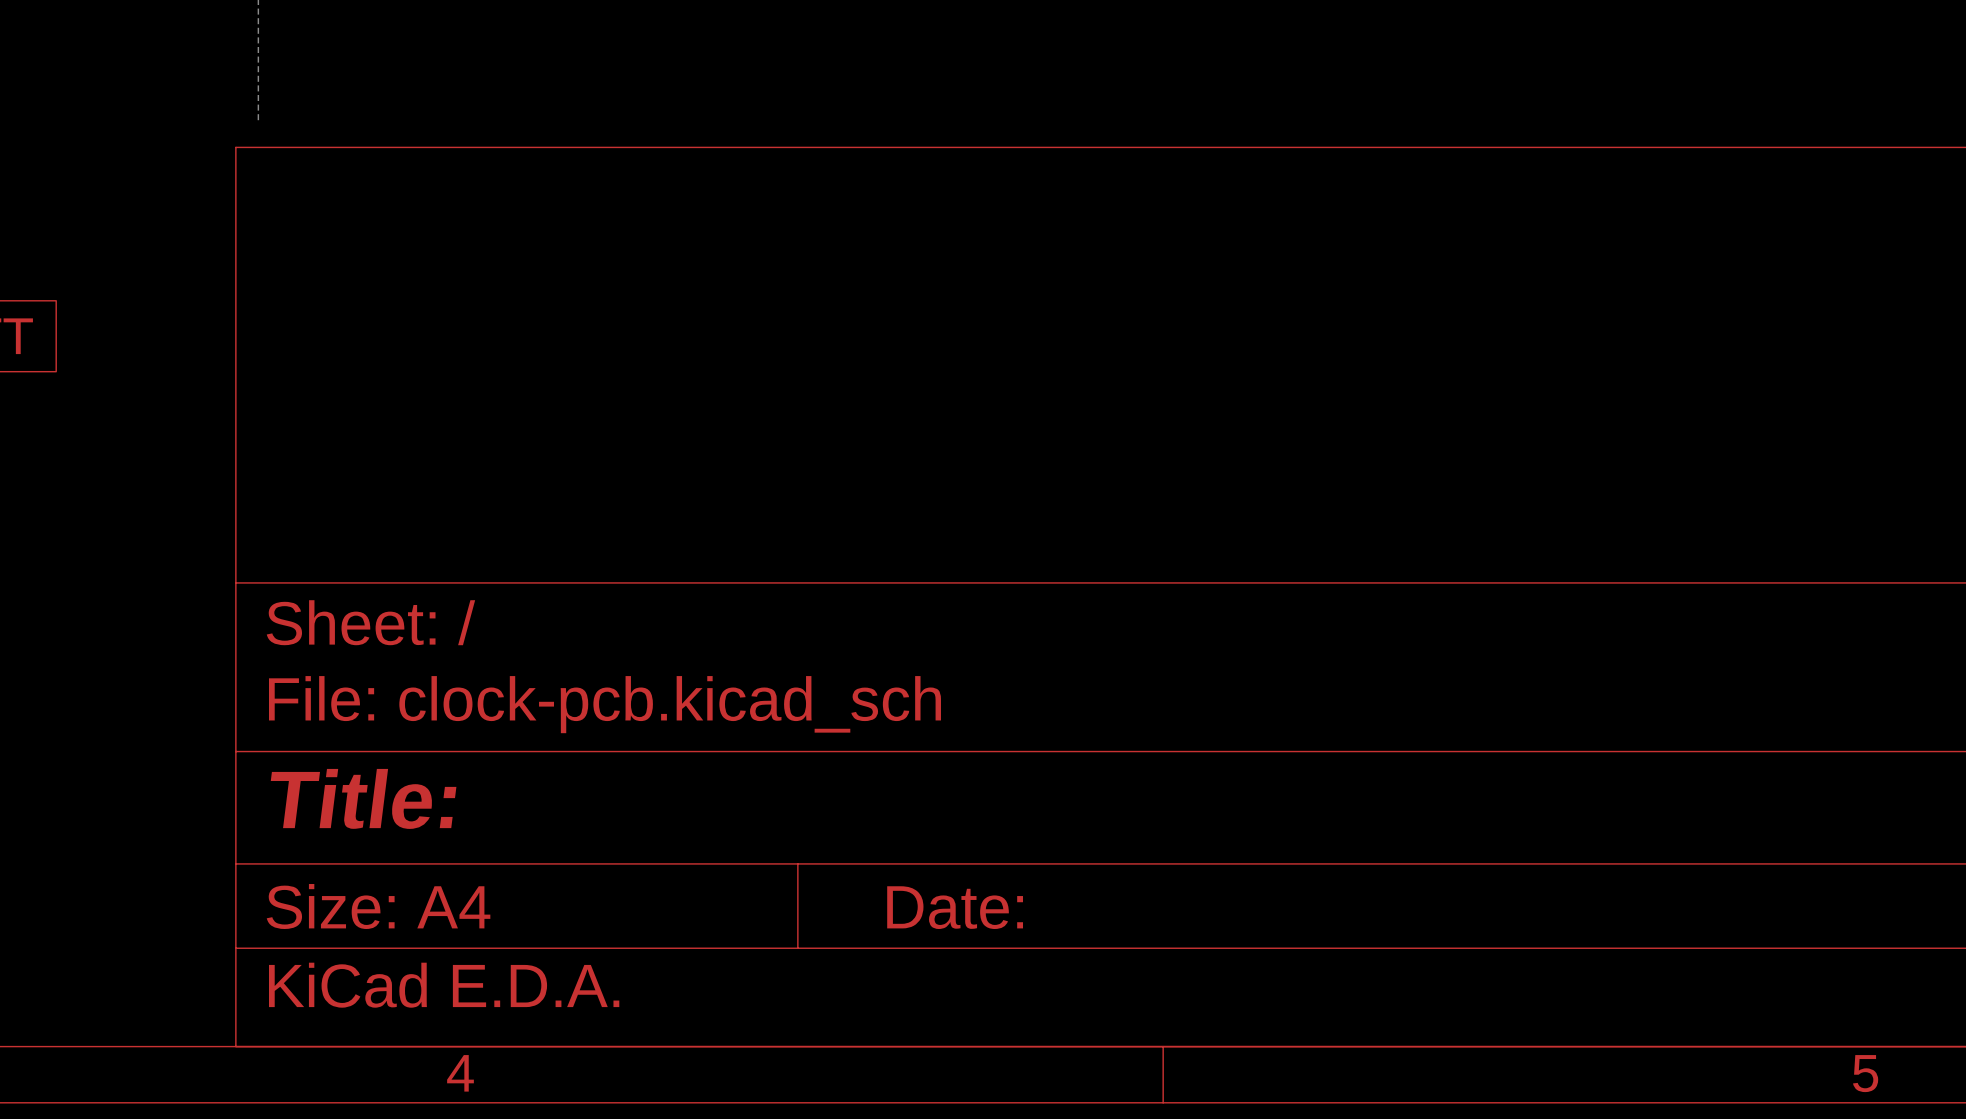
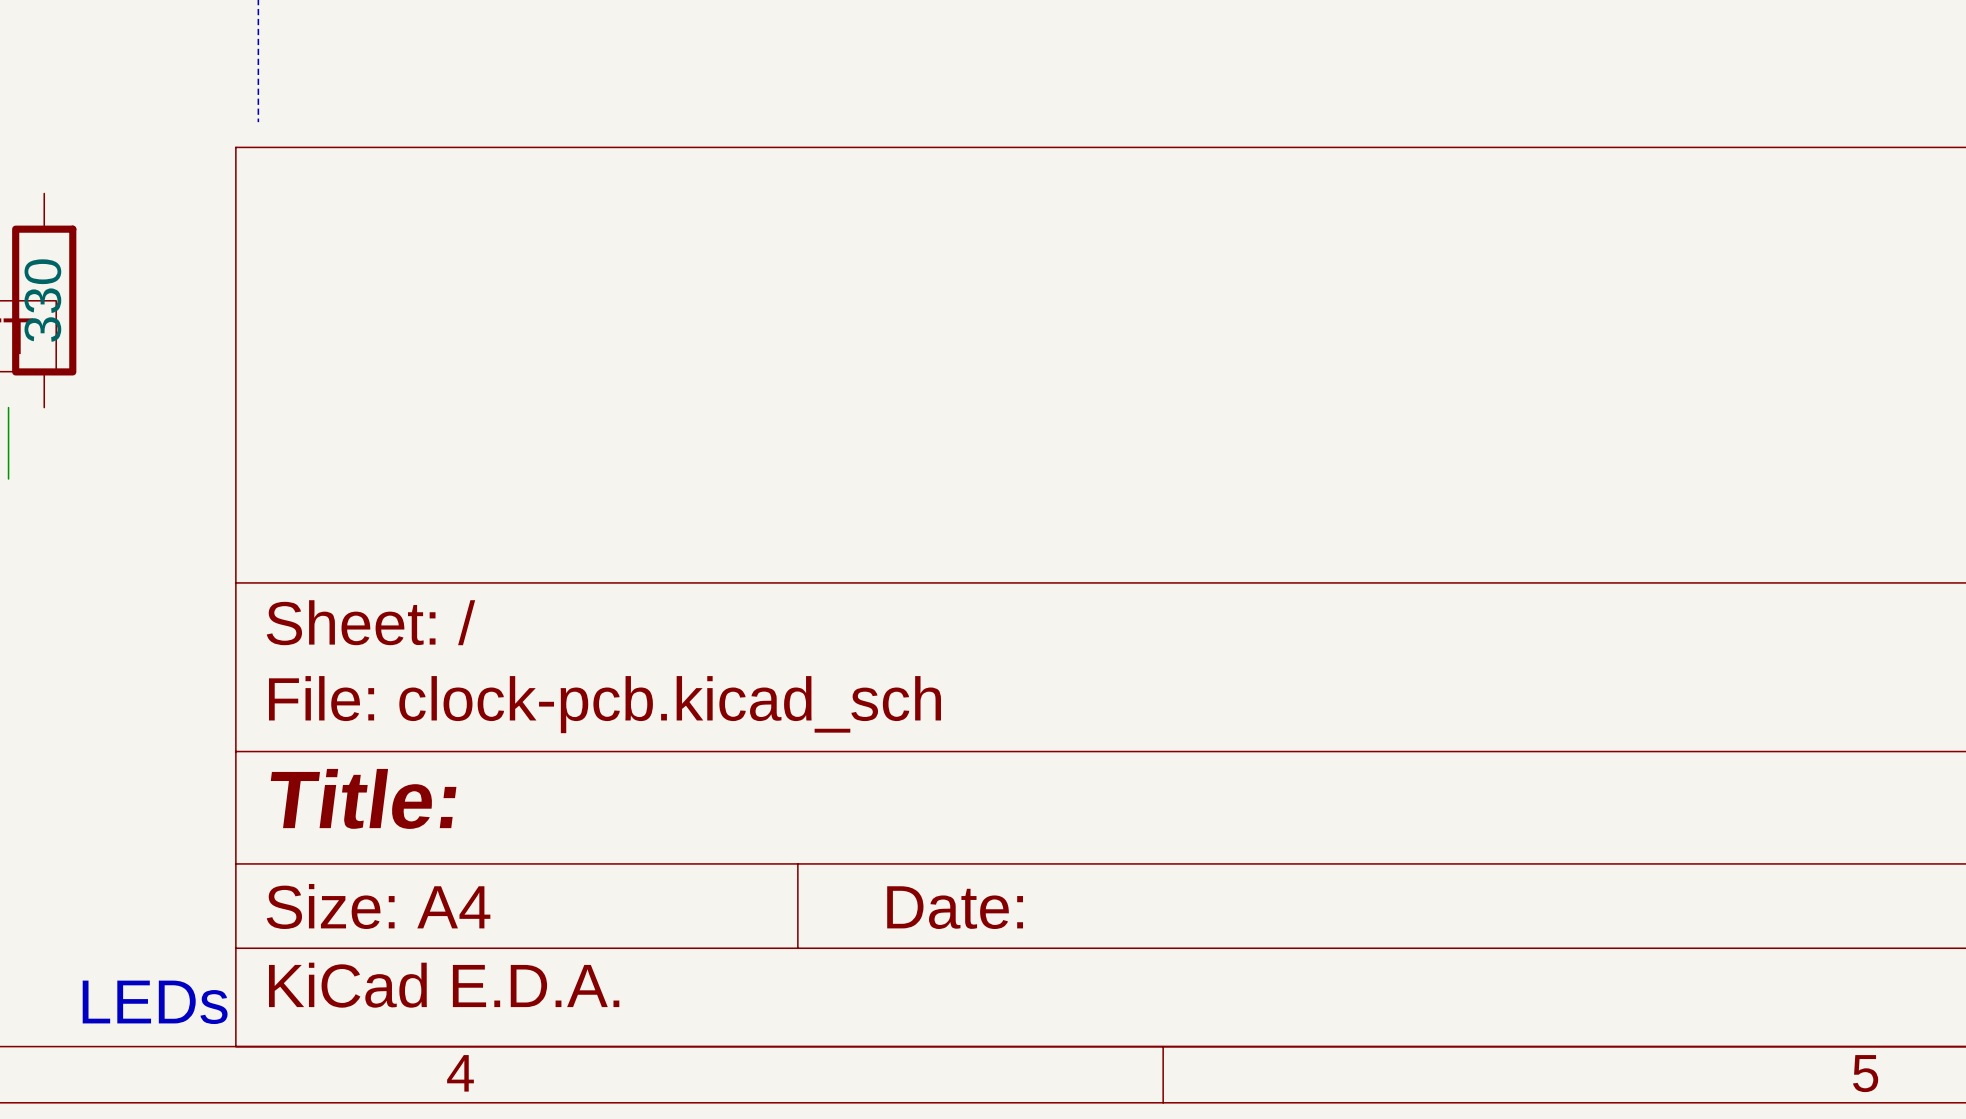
part: none -> 330 (44, 300)
wire: none -> (8, 407) (8, 478)
text: none -> LEDs (155, 1002)

